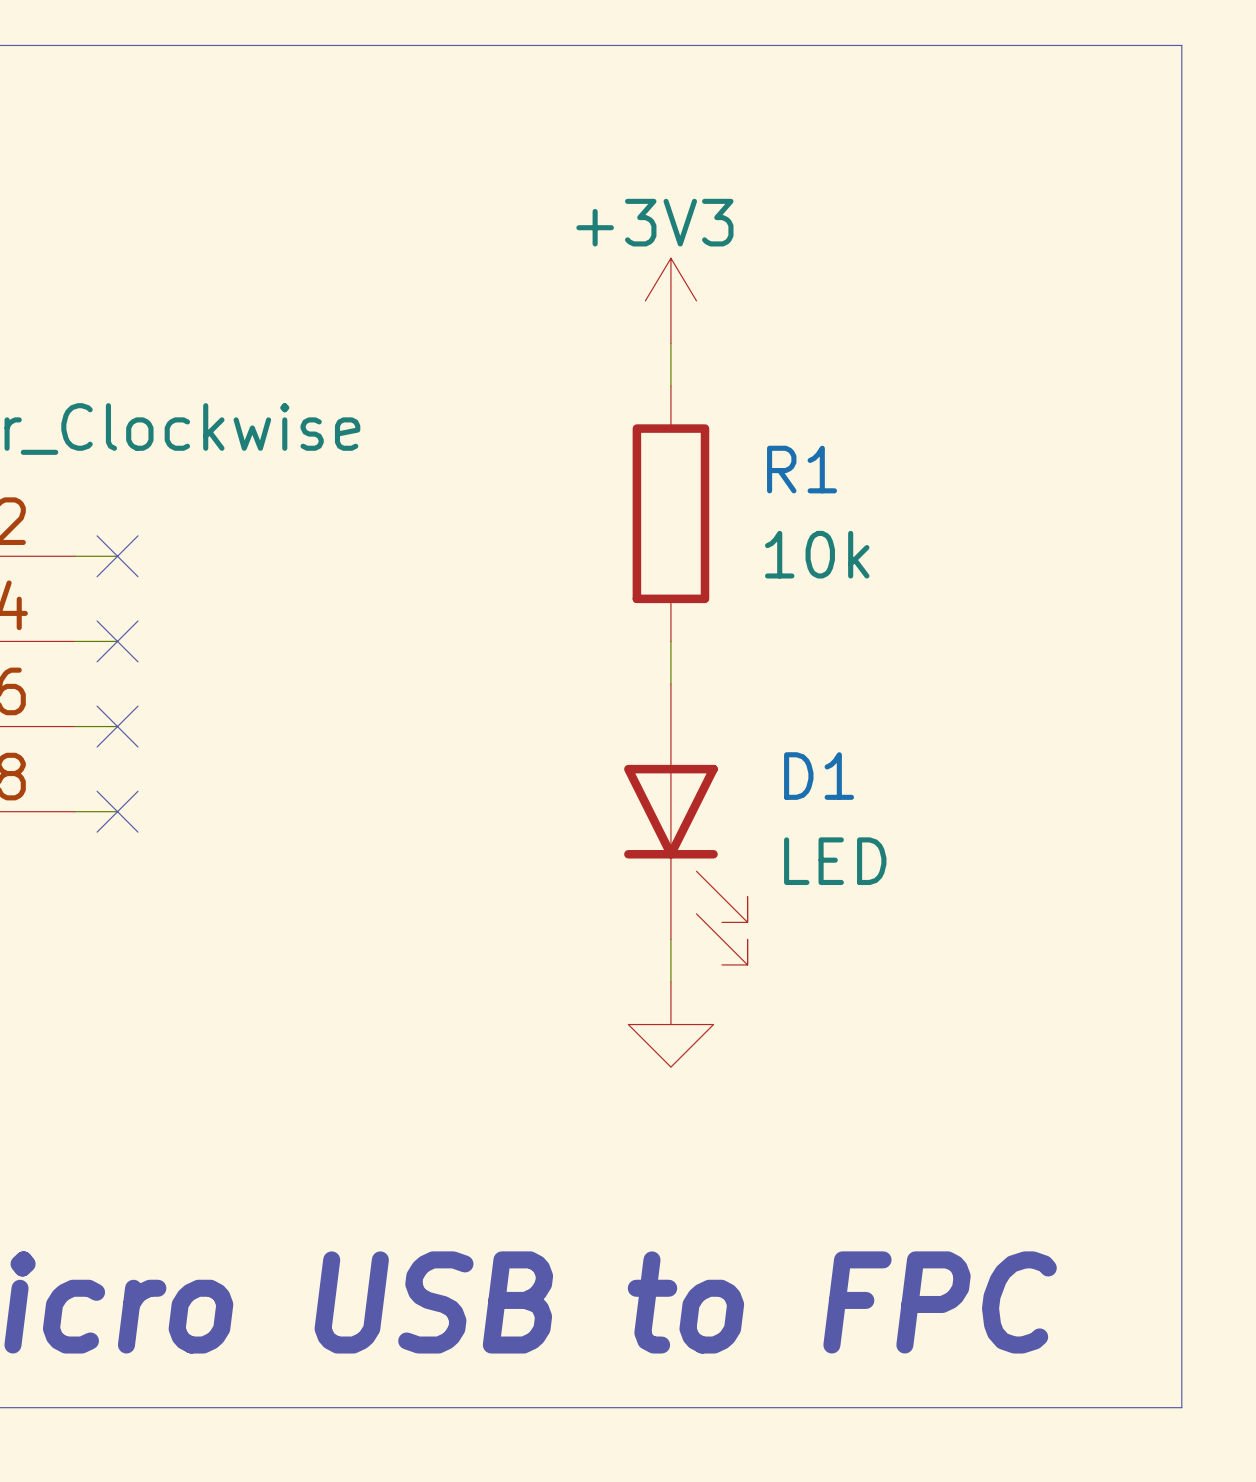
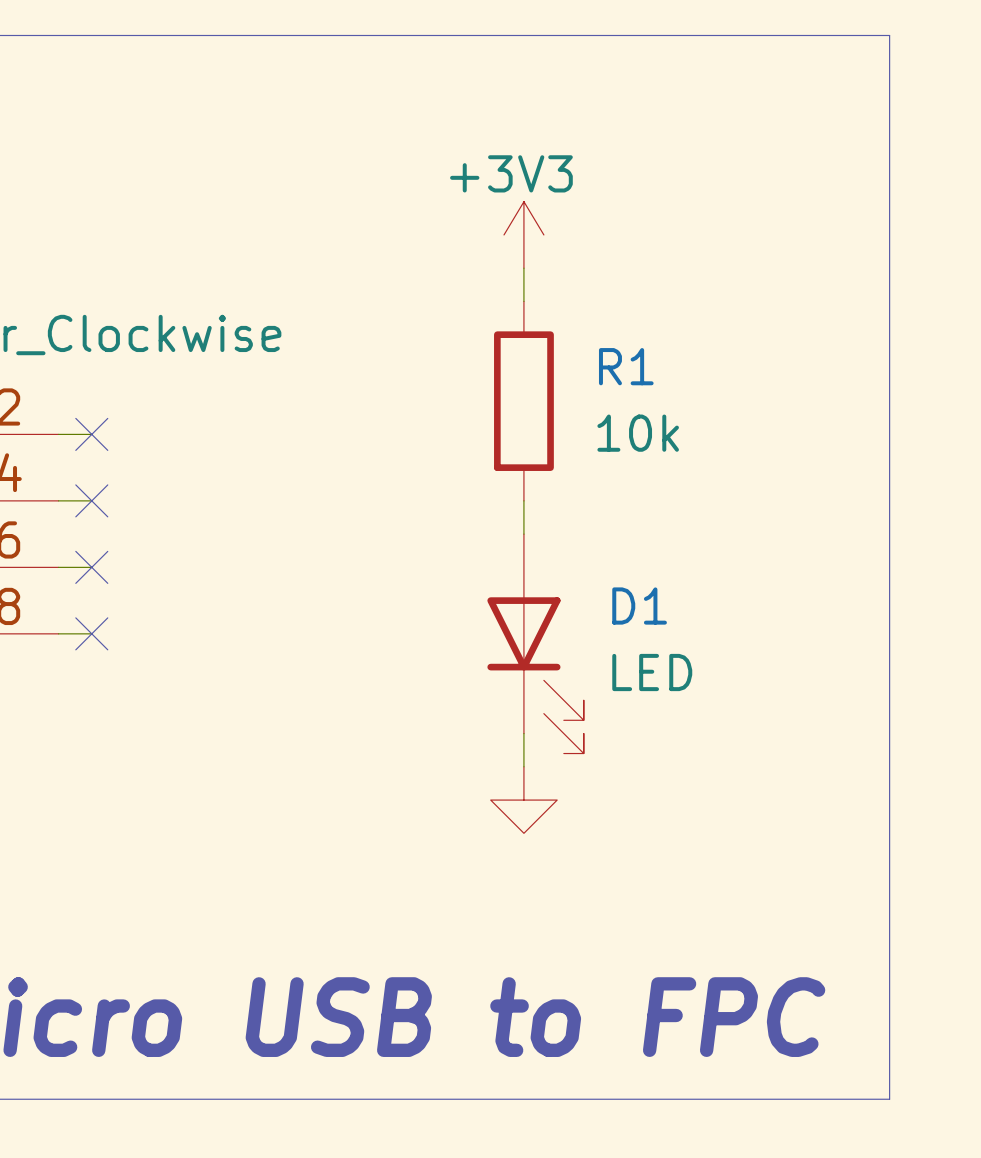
line: (1139, 45) (1181, 45) (1181, 1407) (1139, 1407) -> (889, 35) (889, 1099)

